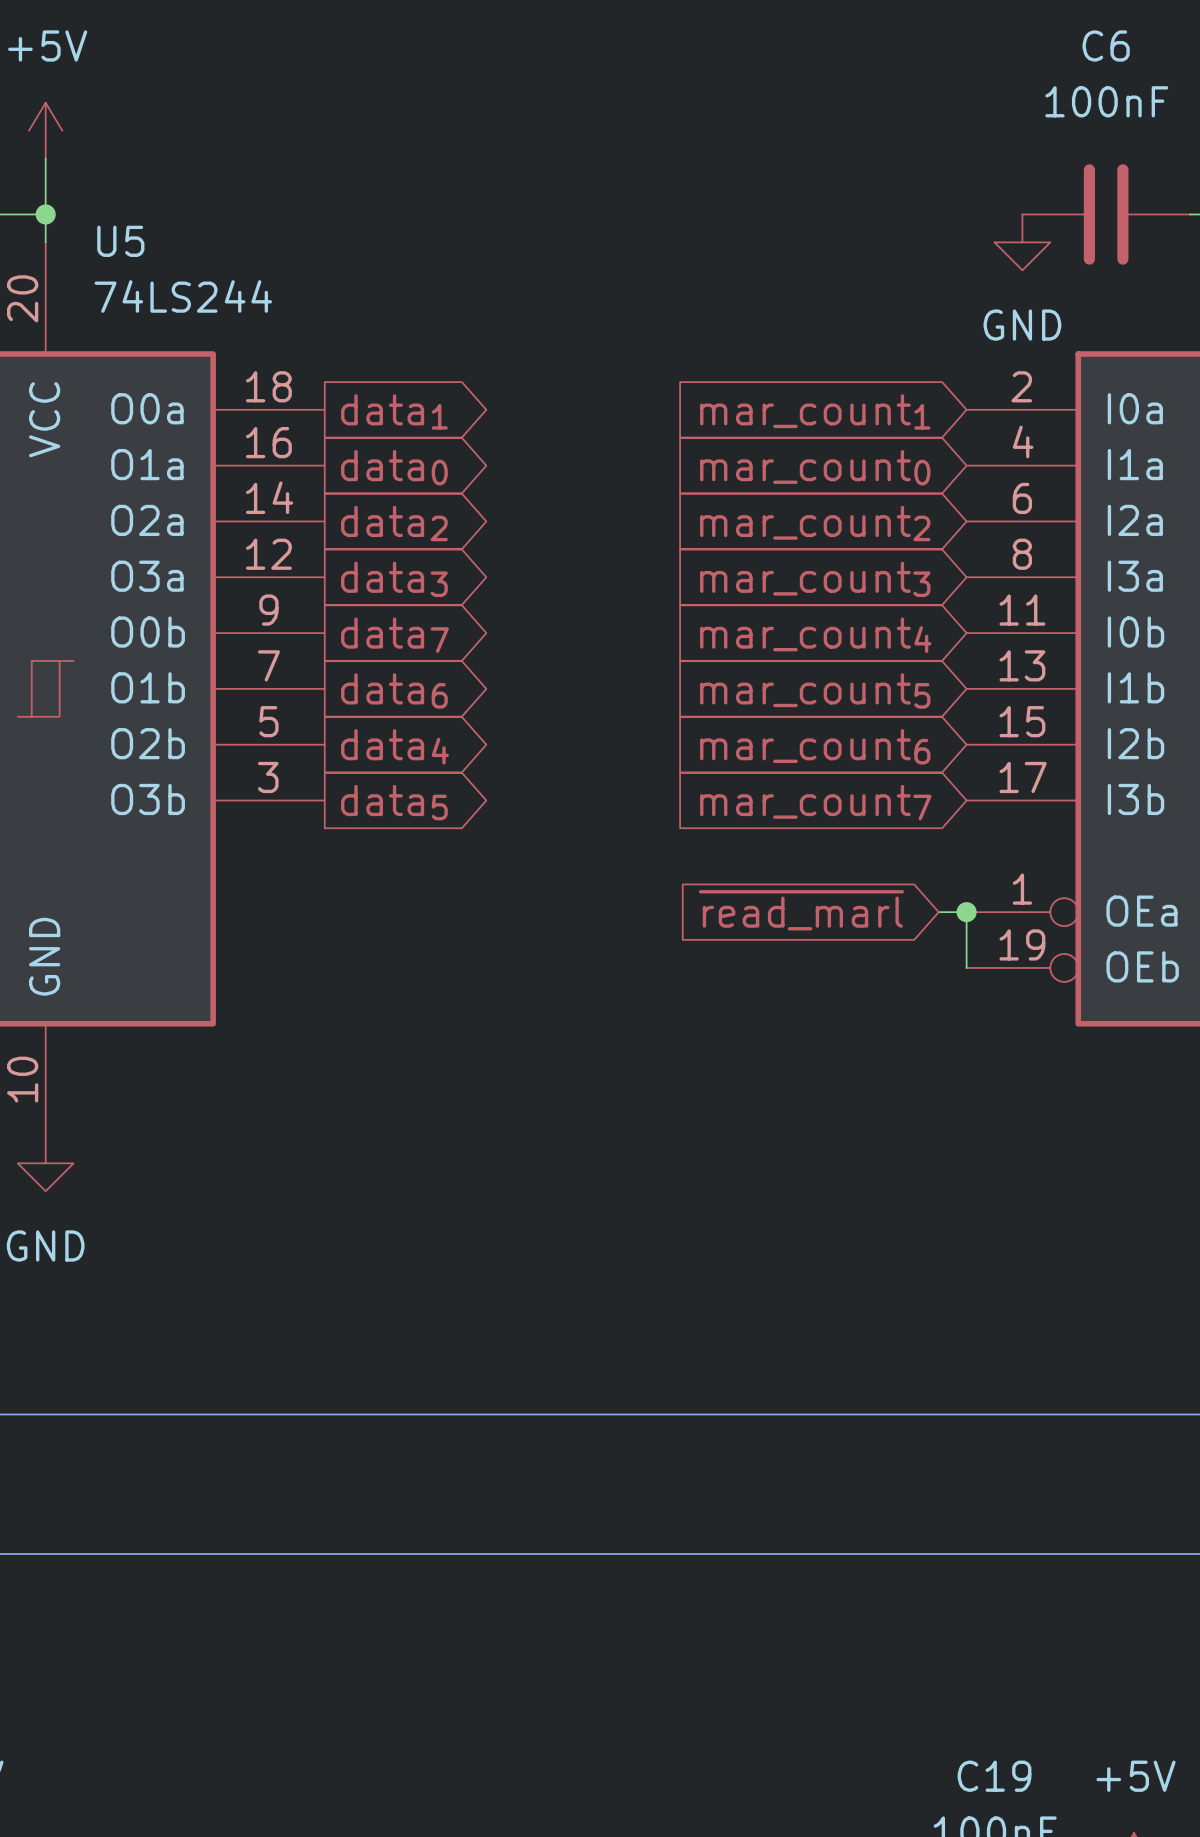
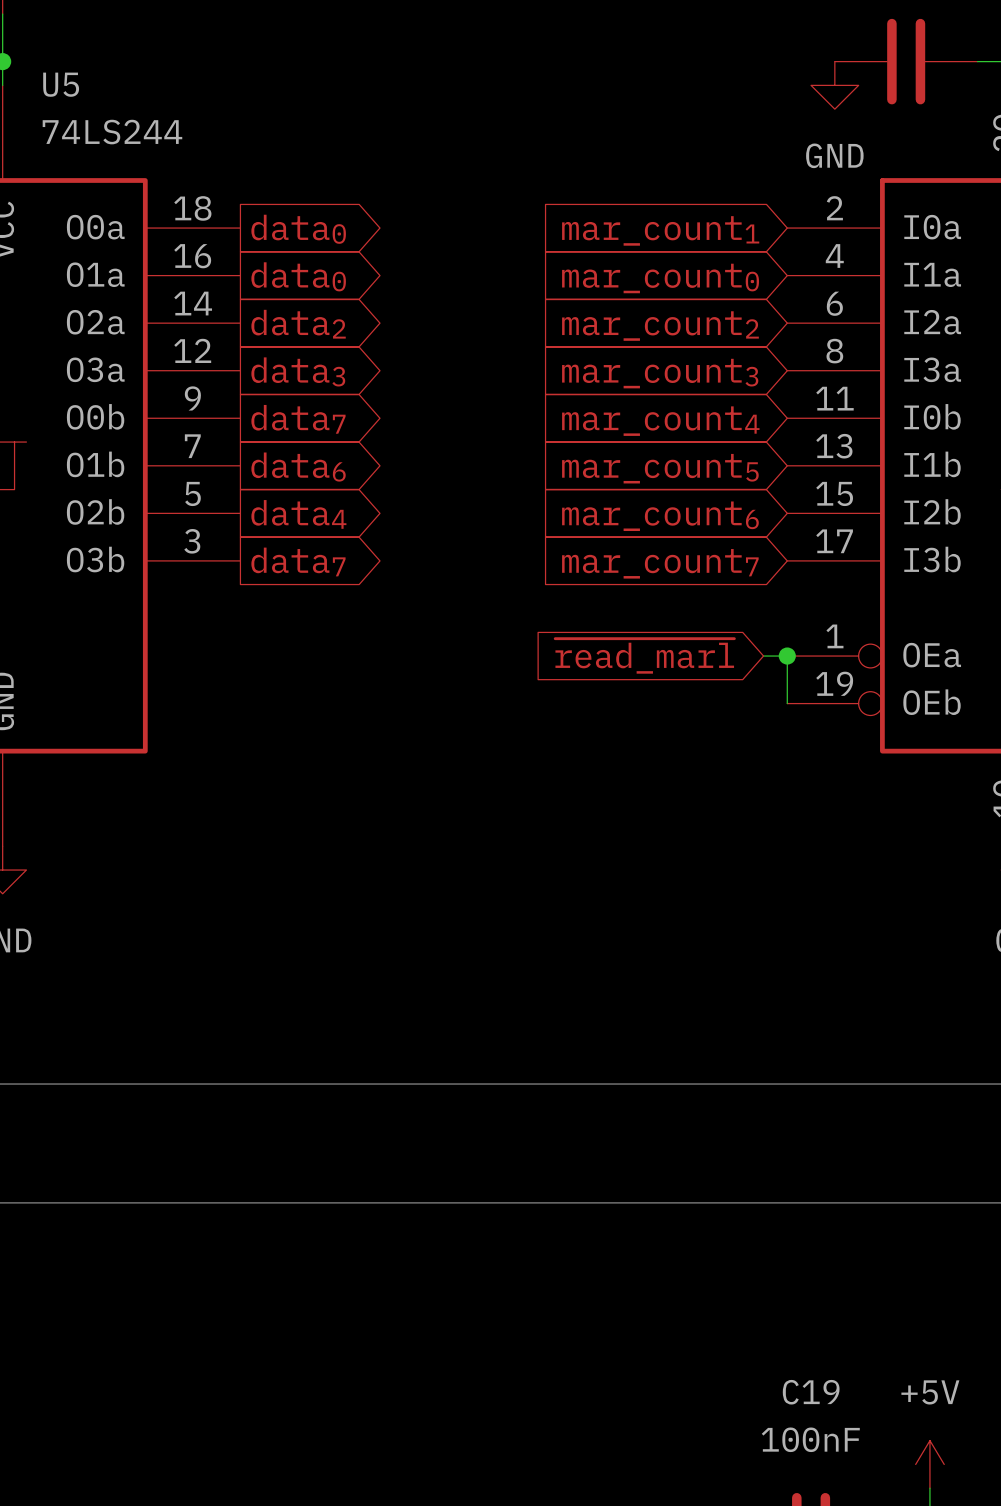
global label: data1 (394, 411) -> data0 (298, 229)
global label: data5 (394, 802) -> data7 (298, 561)

